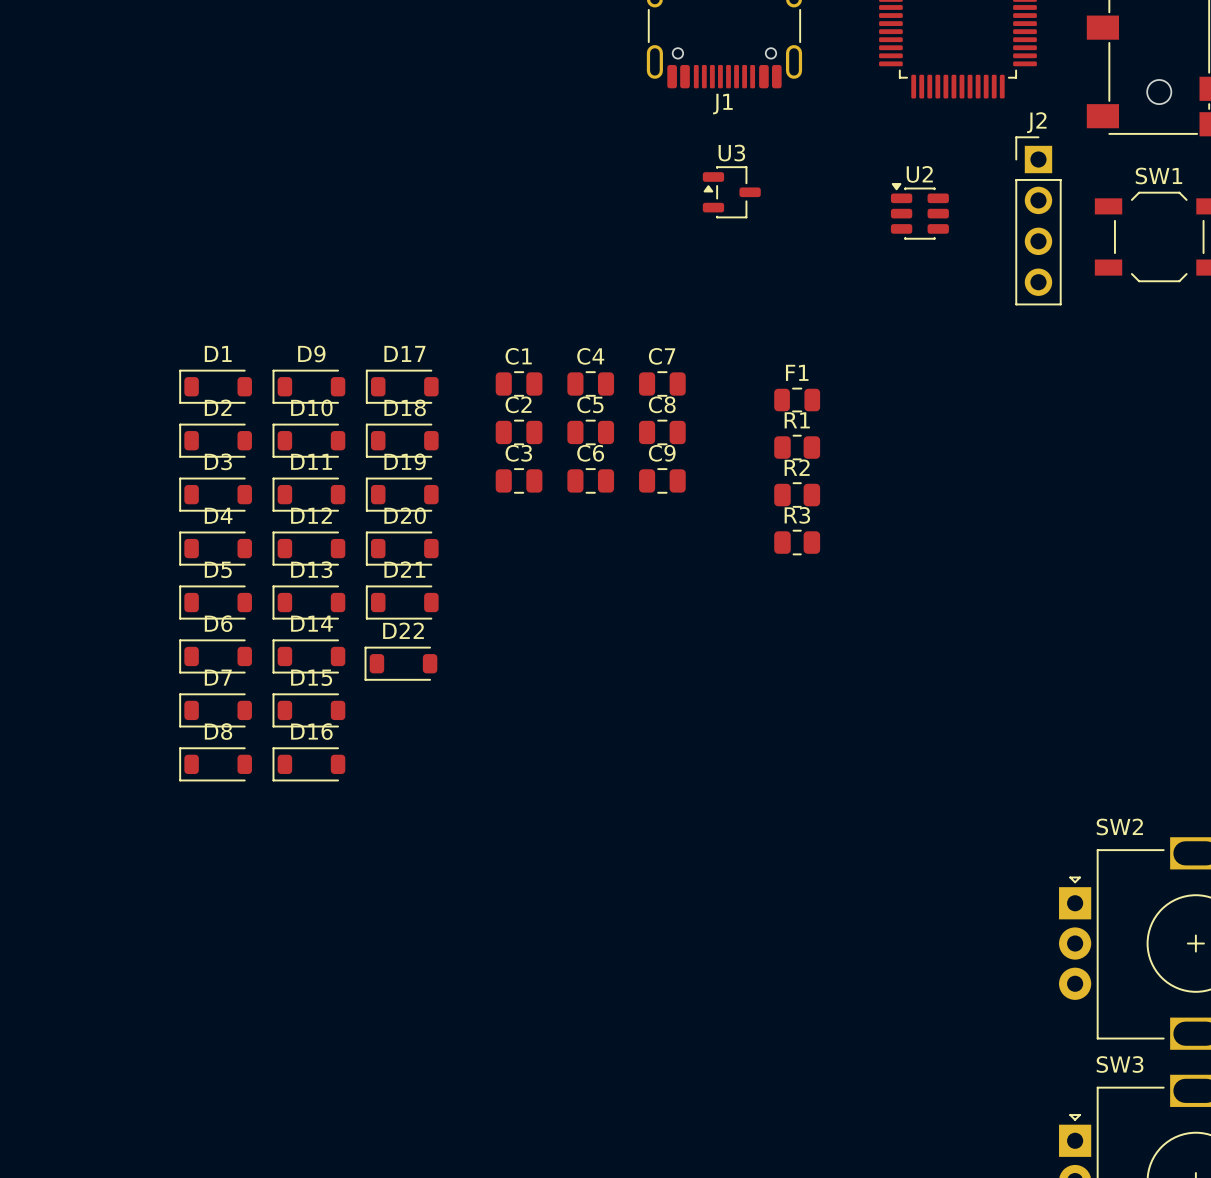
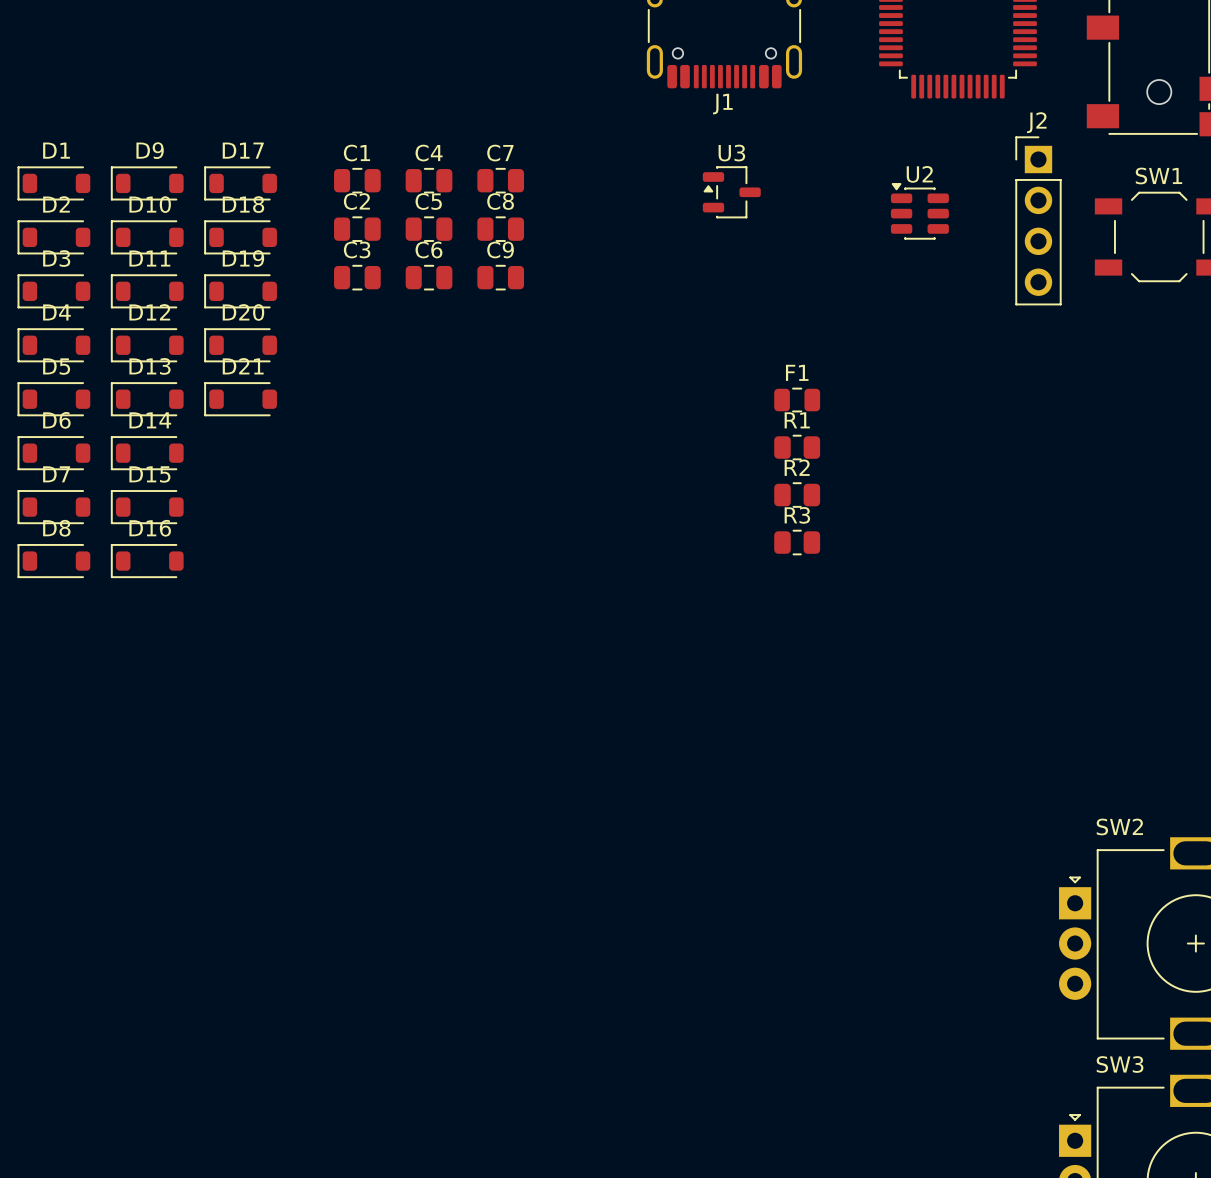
C1 position: (519, 383) -> (357, 180)
C4 position: (590, 383) -> (429, 180)
C7 position: (662, 383) -> (500, 180)
D1 position: (215, 386) -> (53, 183)
D9 position: (308, 386) -> (147, 183)
D17 position: (402, 386) -> (240, 183)
C2 position: (519, 432) -> (357, 229)
C5 position: (590, 432) -> (429, 229)
C8 position: (662, 432) -> (500, 229)
D2 position: (215, 440) -> (53, 237)
D10 position: (308, 440) -> (147, 237)
D18 position: (402, 440) -> (240, 237)
C3 position: (519, 480) -> (357, 277)
C6 position: (590, 480) -> (429, 277)
C9 position: (662, 480) -> (500, 277)
D3 position: (215, 494) -> (53, 291)
D11 position: (308, 494) -> (147, 291)
D19 position: (402, 494) -> (240, 291)
D4 position: (215, 548) -> (53, 345)
D12 position: (308, 548) -> (147, 345)
D20 position: (402, 548) -> (240, 345)
D5 position: (215, 602) -> (53, 399)
D13 position: (308, 602) -> (147, 399)
D21 position: (402, 602) -> (240, 399)
D6 position: (215, 656) -> (53, 453)
D14 position: (308, 656) -> (147, 453)
D22: (400, 663) -> none
D7 position: (215, 710) -> (53, 507)
D15 position: (308, 710) -> (147, 507)
D8 position: (215, 764) -> (53, 561)
D16 position: (308, 764) -> (147, 561)

